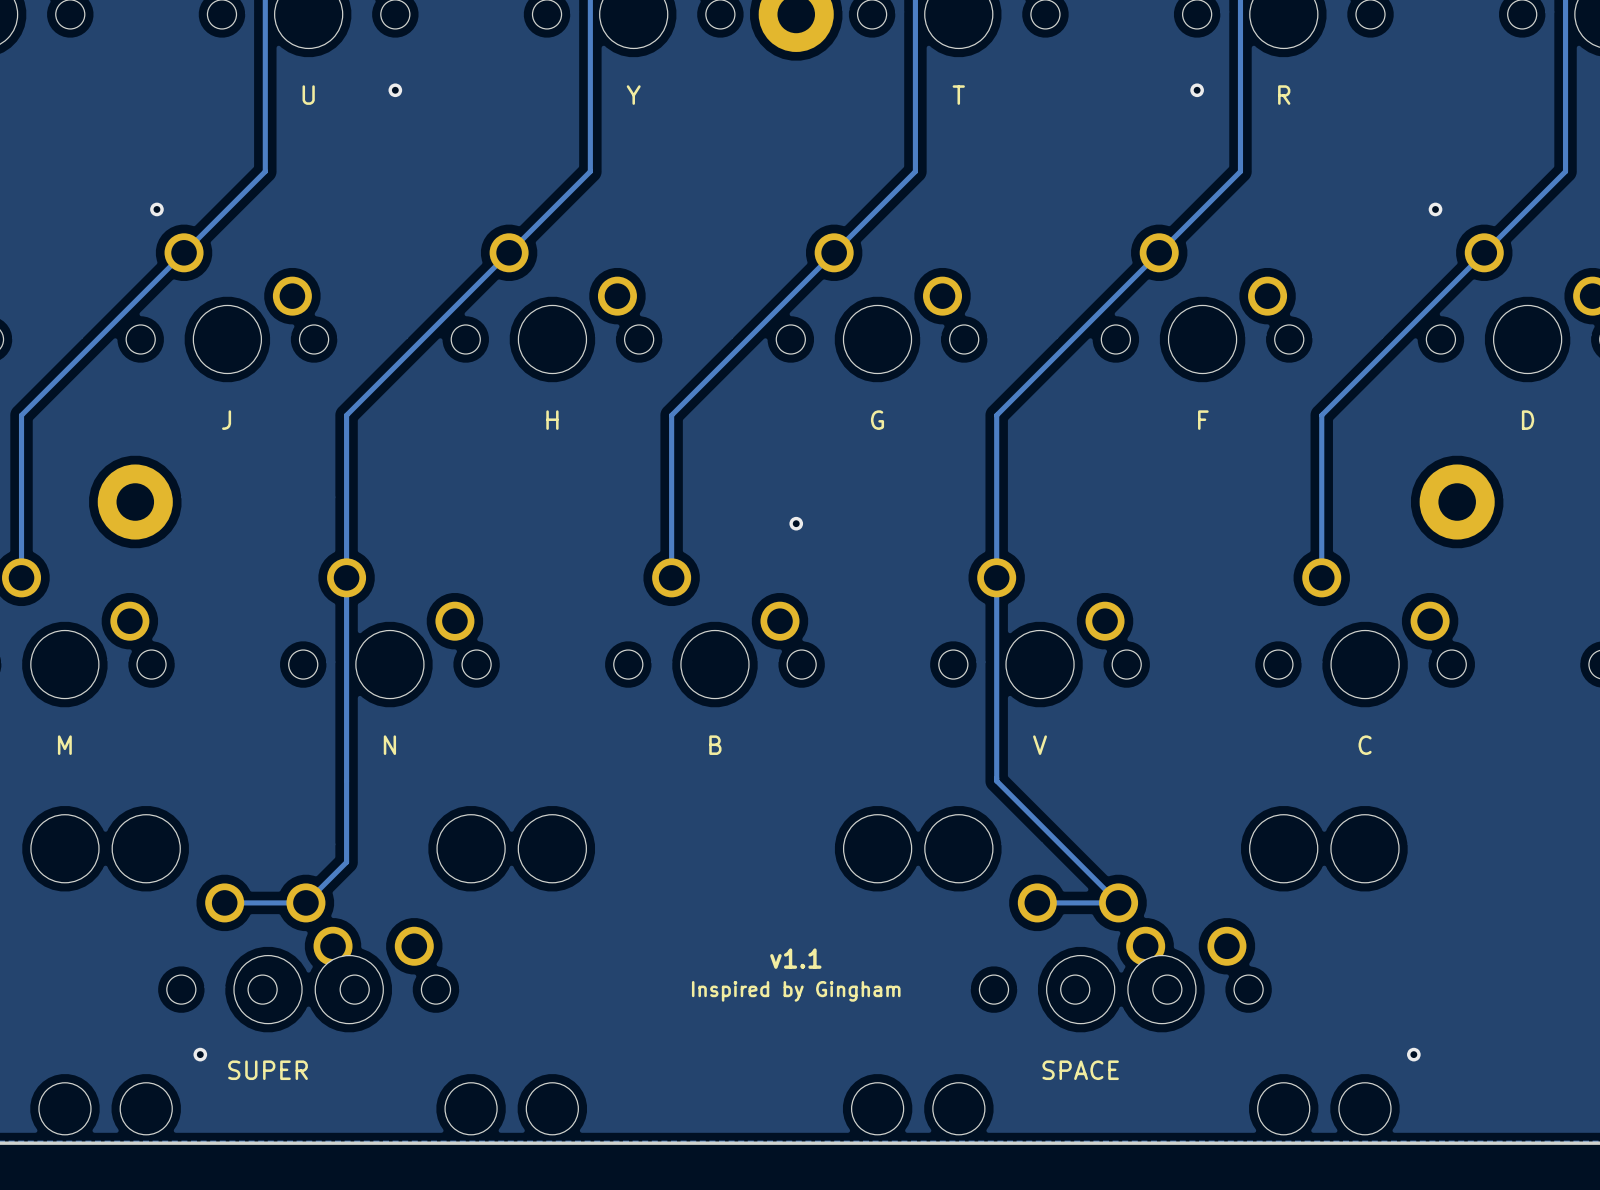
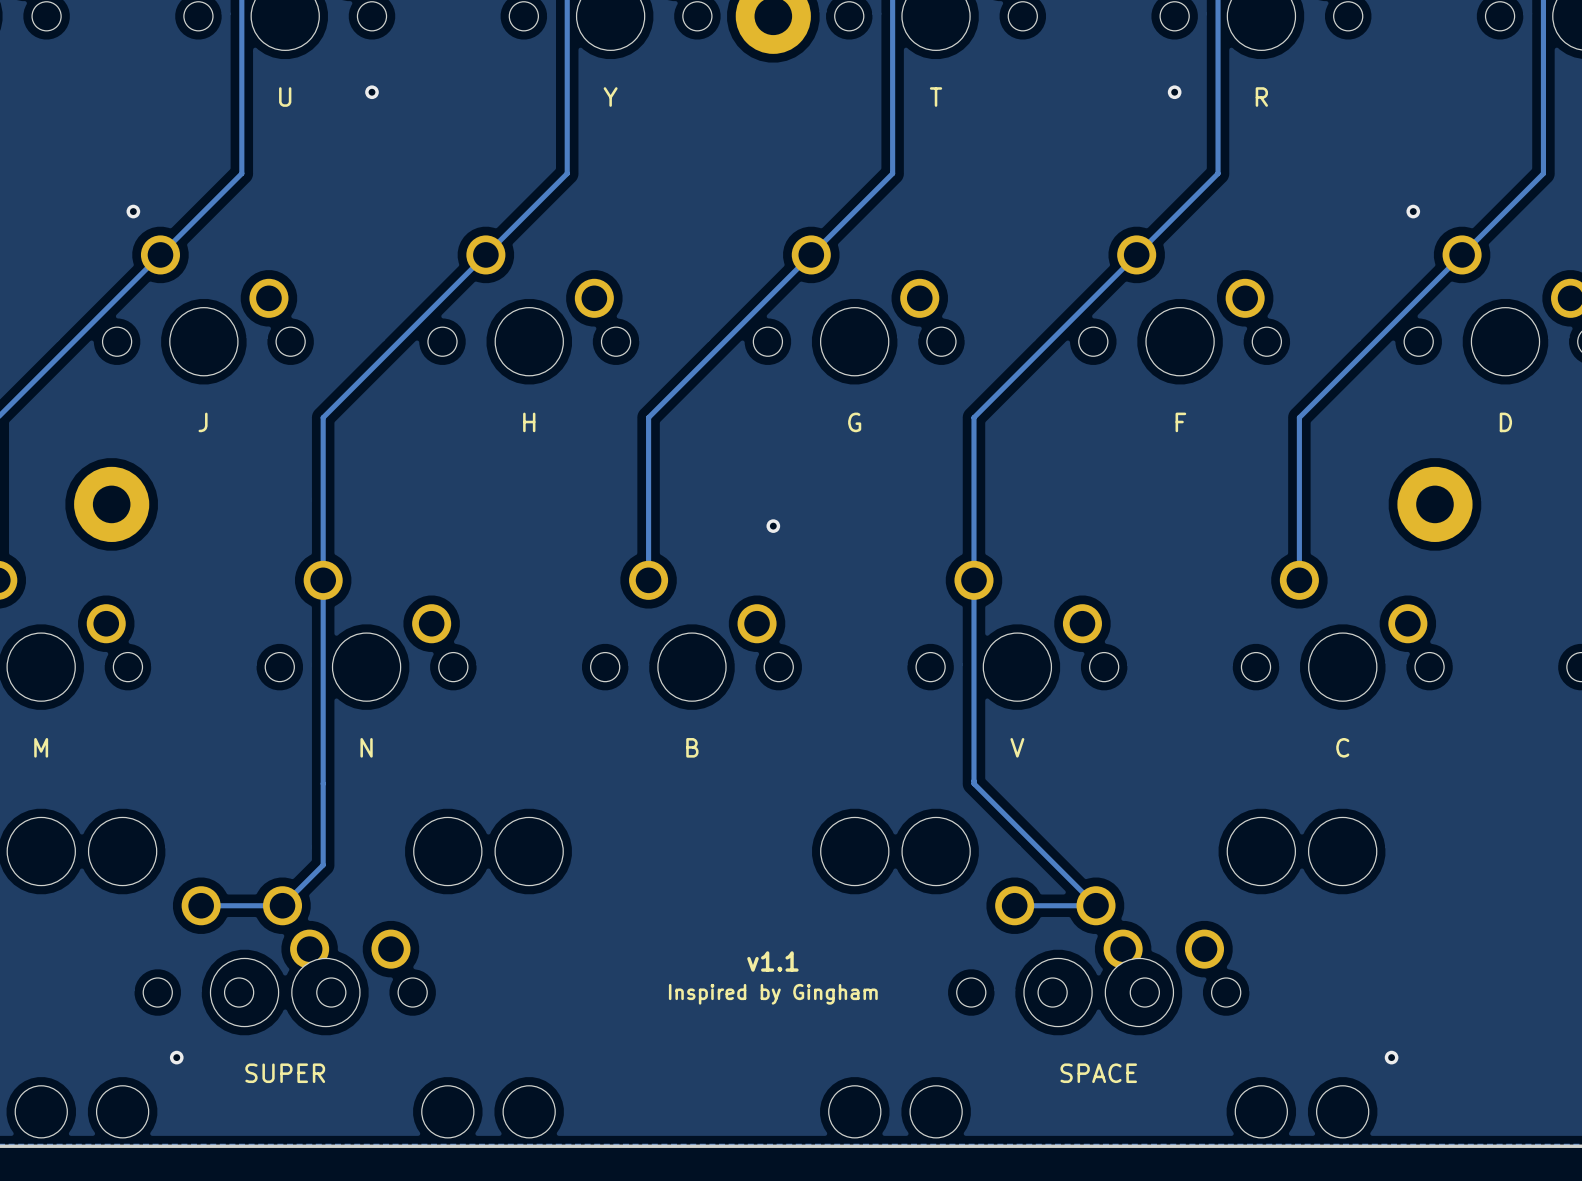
text position: SUPER (268, 1070) -> SUPER (285, 1073)
text position: SPACE (1080, 1070) -> SPACE (1098, 1073)

